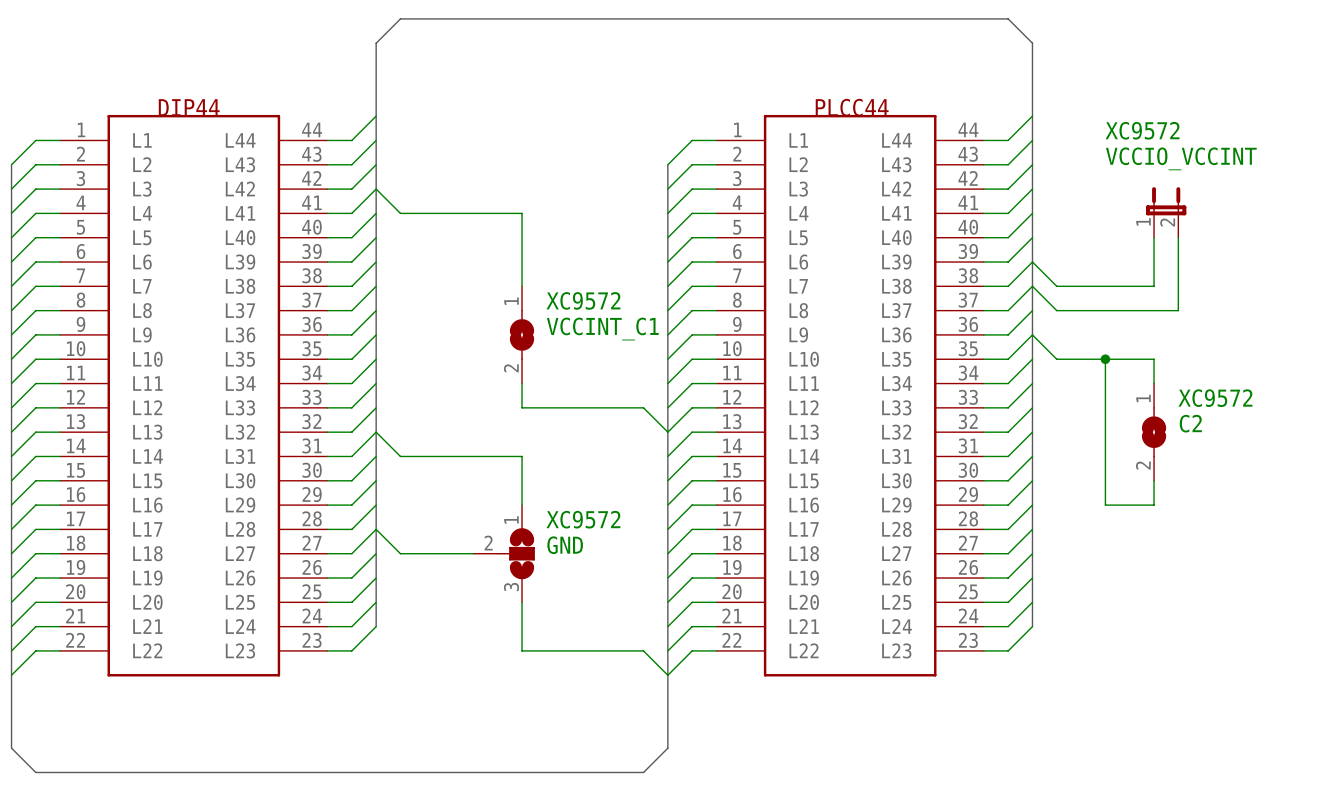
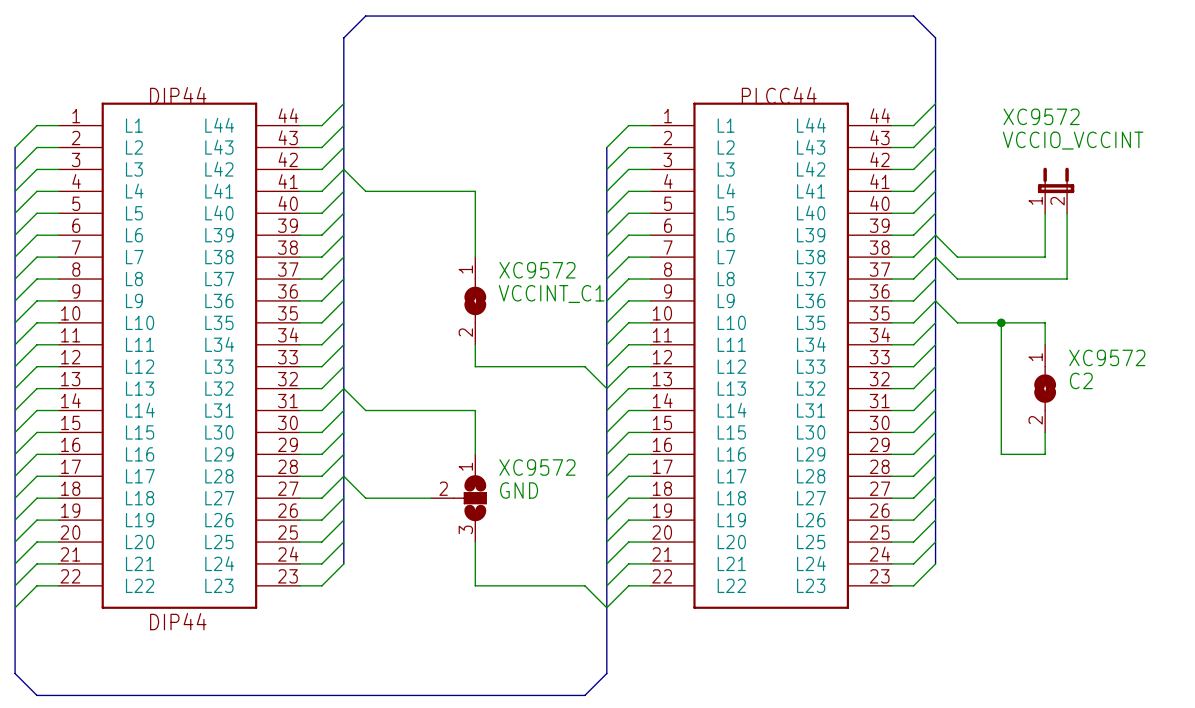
DIP44 value: none -> DIP44 (178, 621)

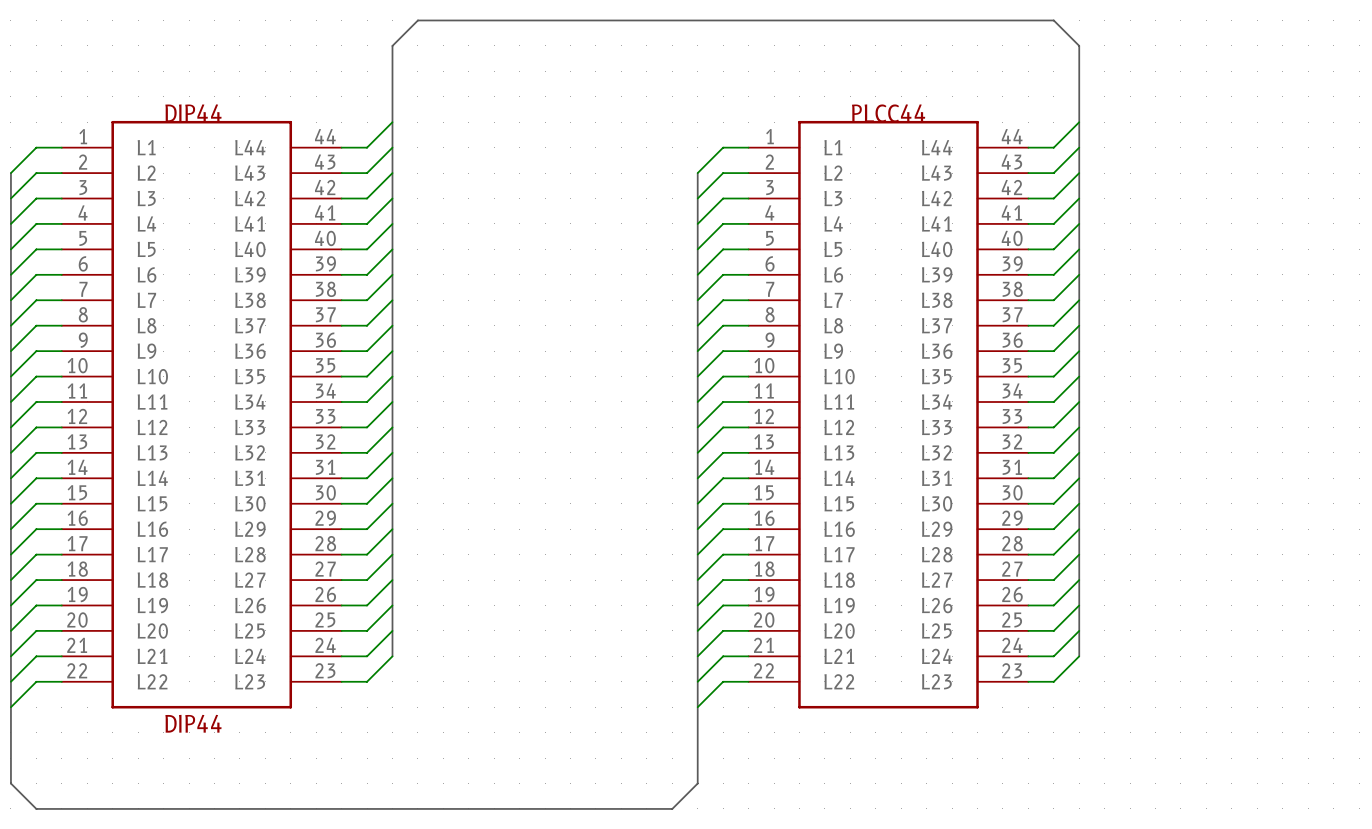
text: XC9572 (1041, 116) -> none
text: VCCIO_VCCINT (1073, 140) -> none
wire: (343, 169) (365, 191) (475, 191) (475, 257) -> none
part: (1056, 190) -> none
wire: (1045, 213) (1045, 257) (957, 257) (935, 235) -> none
wire: (1067, 213) (1067, 279) (957, 279) (935, 257) -> none
text: XC9572 (537, 270) -> none
text: VCCINT_C1 (551, 294) -> none
part: (475, 300) -> none
wire: (935, 300) (957, 322) (1045, 322) (1045, 344) -> none
wire: (1001, 322) (1001, 454) (1045, 454) (1045, 432) -> none
junction: (1001, 322) -> none
wire: (475, 344) (475, 366) (584, 366) (606, 388) -> none
text: XC9572 (1107, 357) -> none
text: C2 (1081, 380) -> none
wire: (343, 388) (365, 410) (475, 410) (475, 454) -> none
part: (1045, 388) -> none
text: XC9572 (537, 467) -> none
wire: (343, 476) (365, 498) (431, 498) -> none
text: GND (519, 490) -> none
part: (459, 498) -> none
wire: (475, 542) (475, 585) (584, 585) (606, 607) -> none

